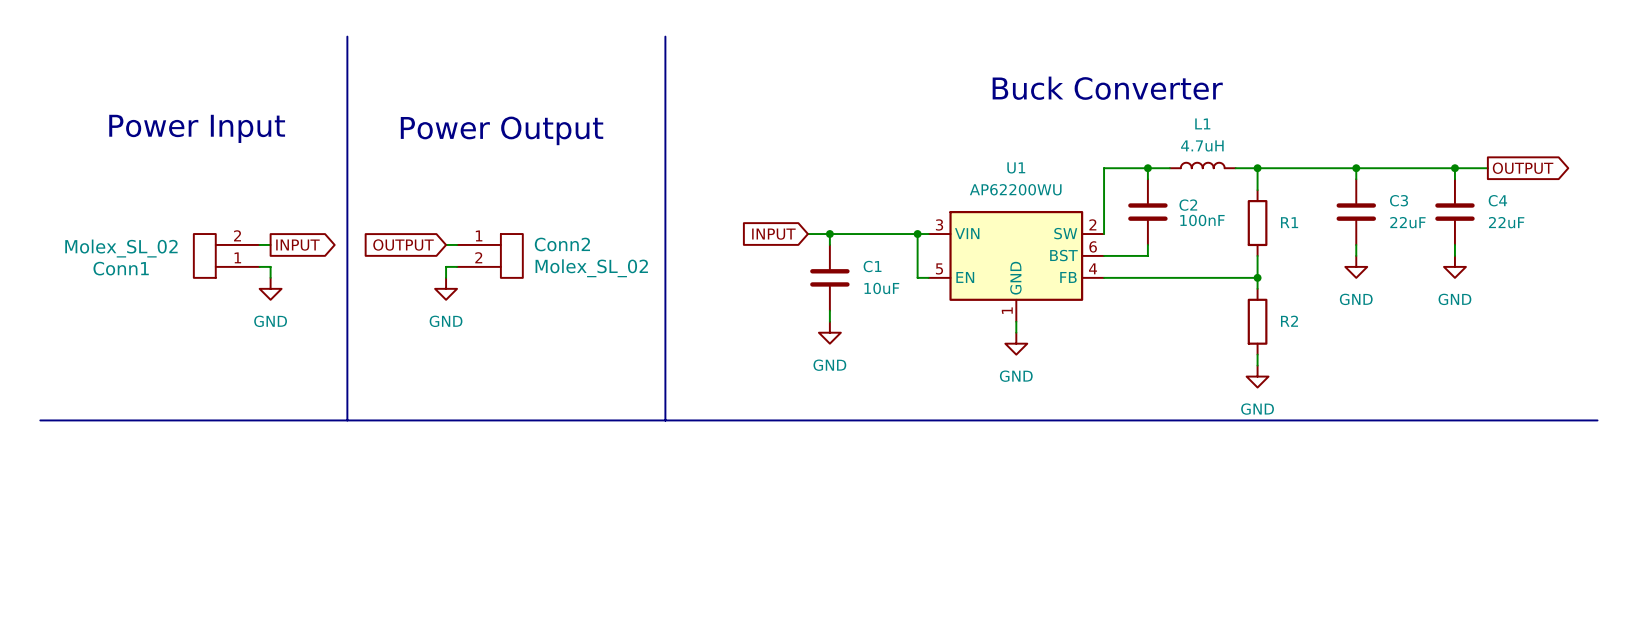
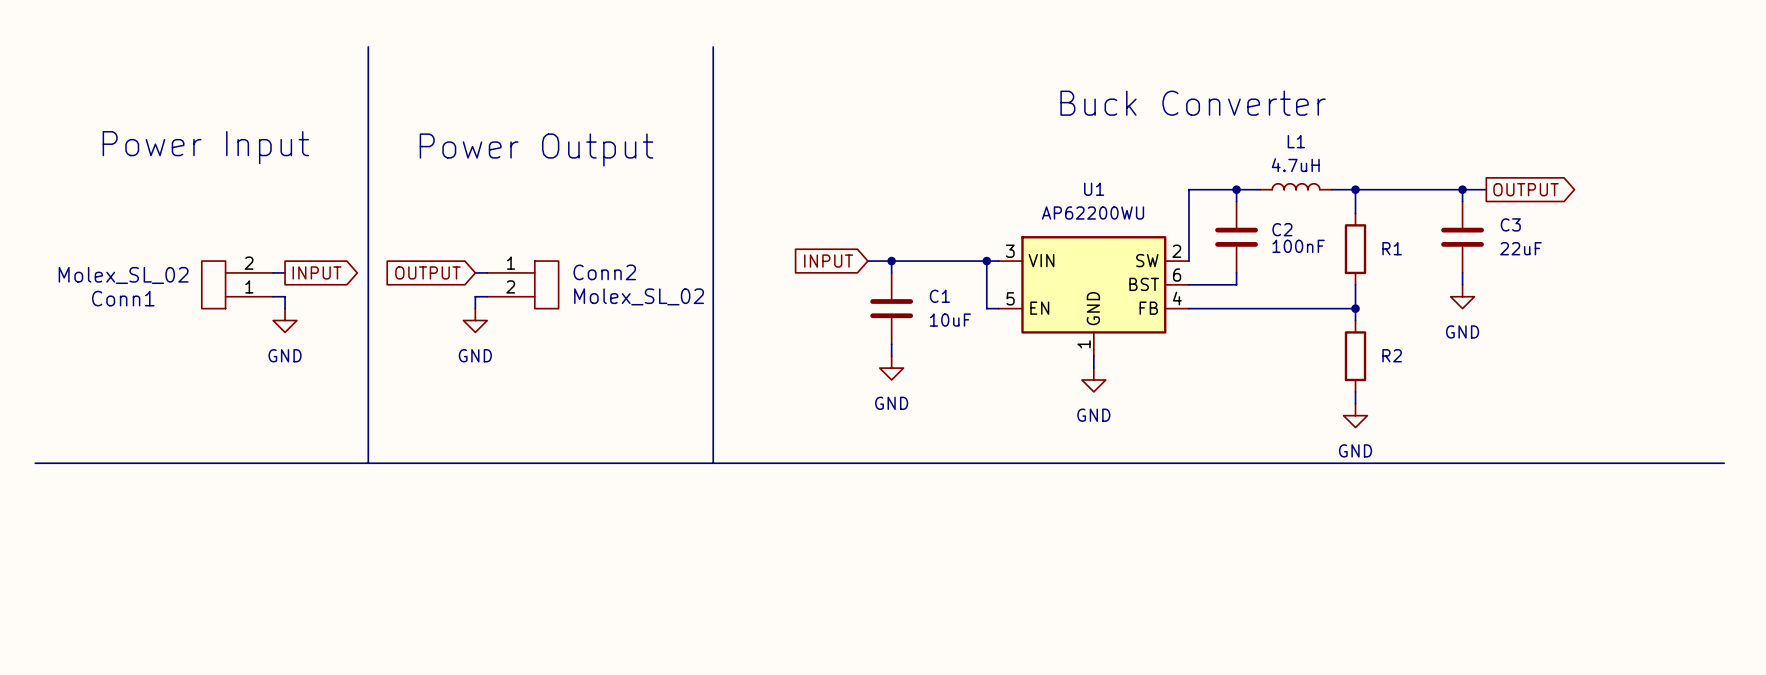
wire: (1378, 168) (1487, 168) -> none
wire: (1454, 168) (1454, 179) -> none
junction: (1454, 168) -> none
global label position: OUTPUT (1523, 168) -> OUTPUT (1526, 189)
C4: 22uF (1454, 212) -> none
wire: (1454, 244) (1454, 255) -> none
power symbol: GND (1454, 266) -> none

